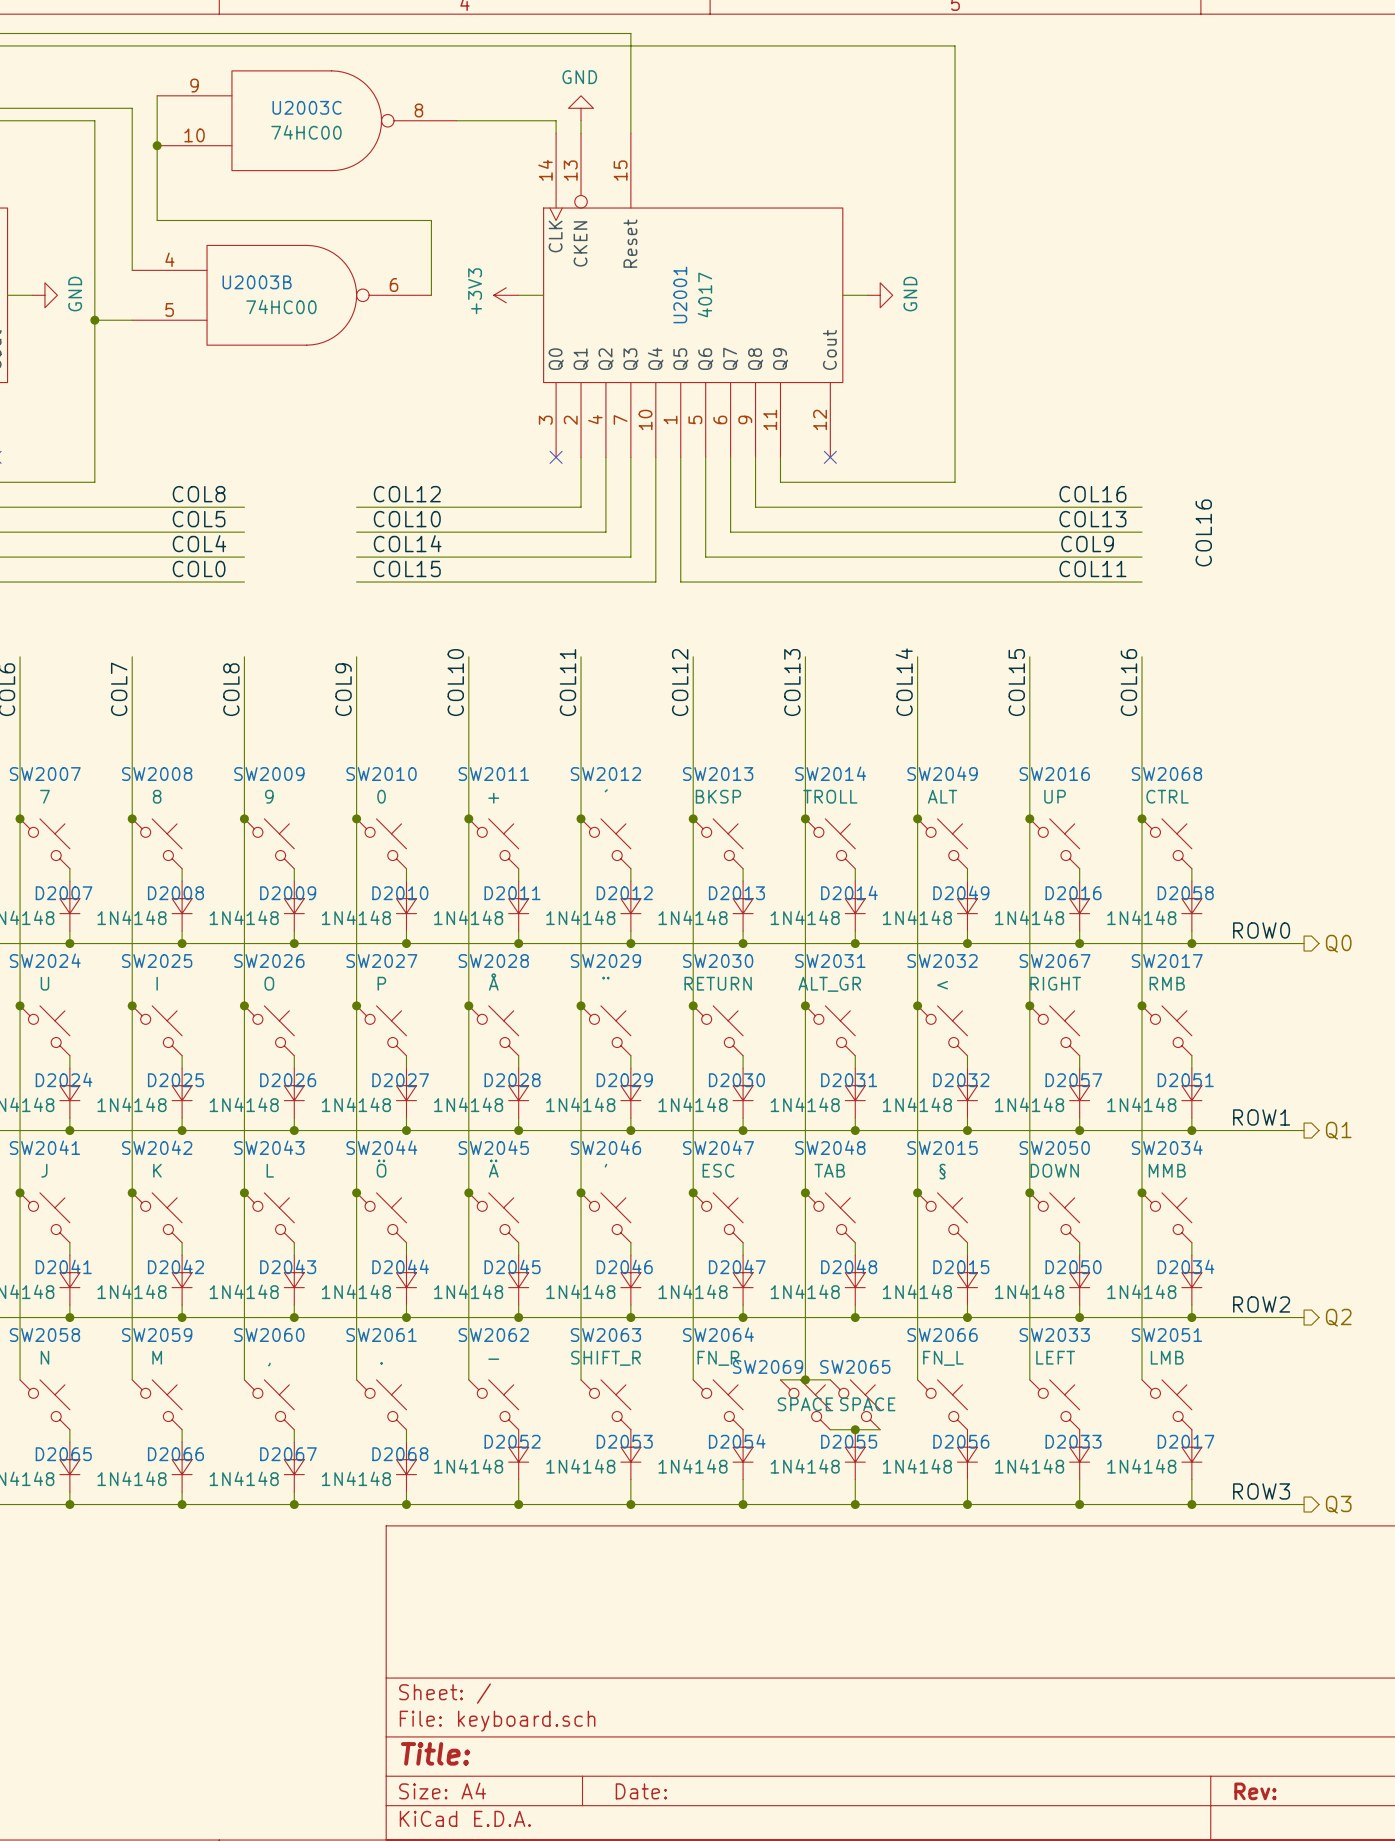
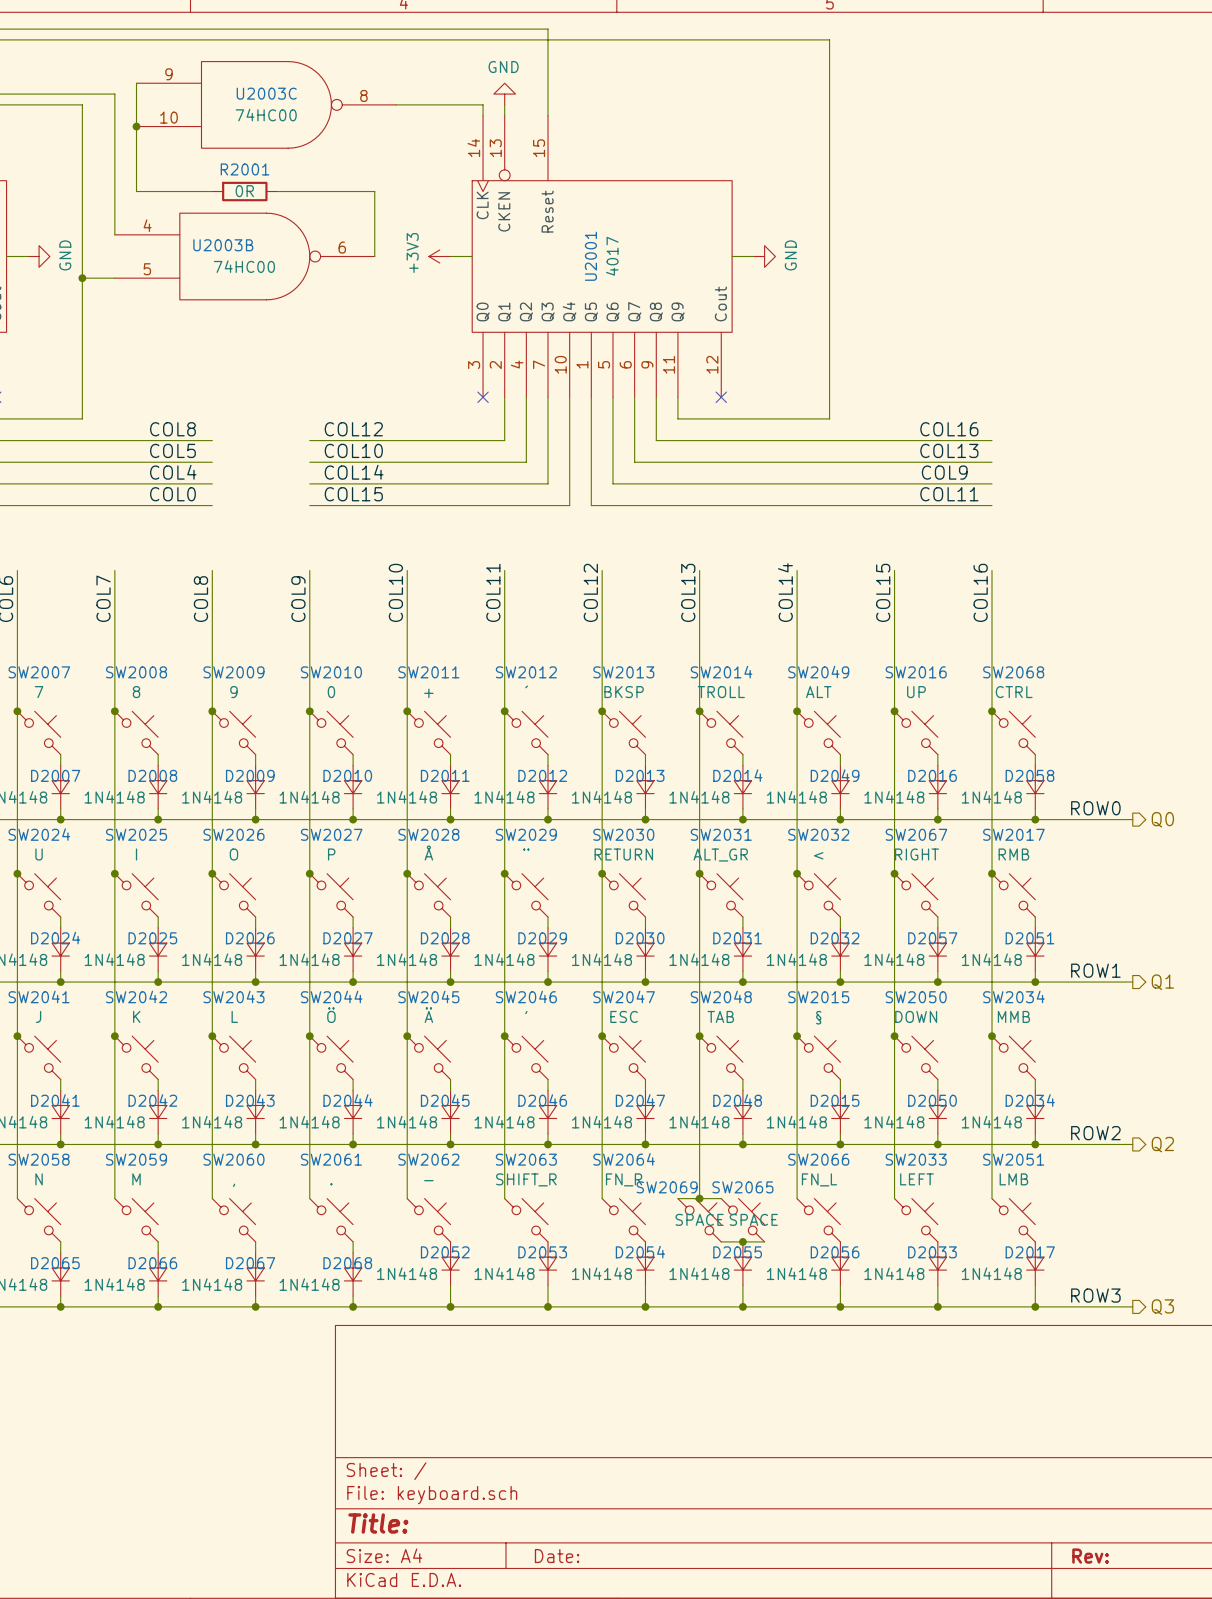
wire: (244, 220) (319, 220) -> none
R2001: none -> 0R (244, 191)
label: COL16 (1203, 532) -> none

